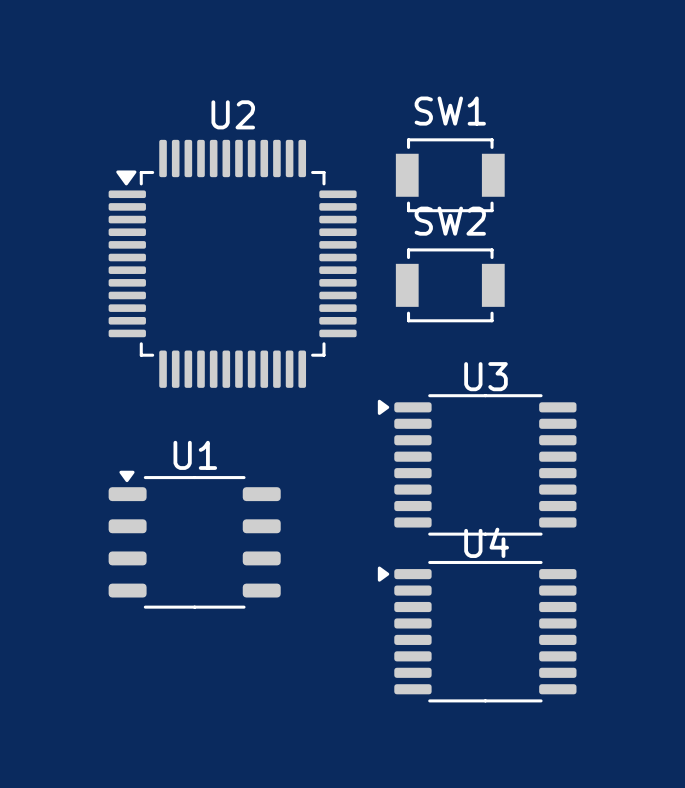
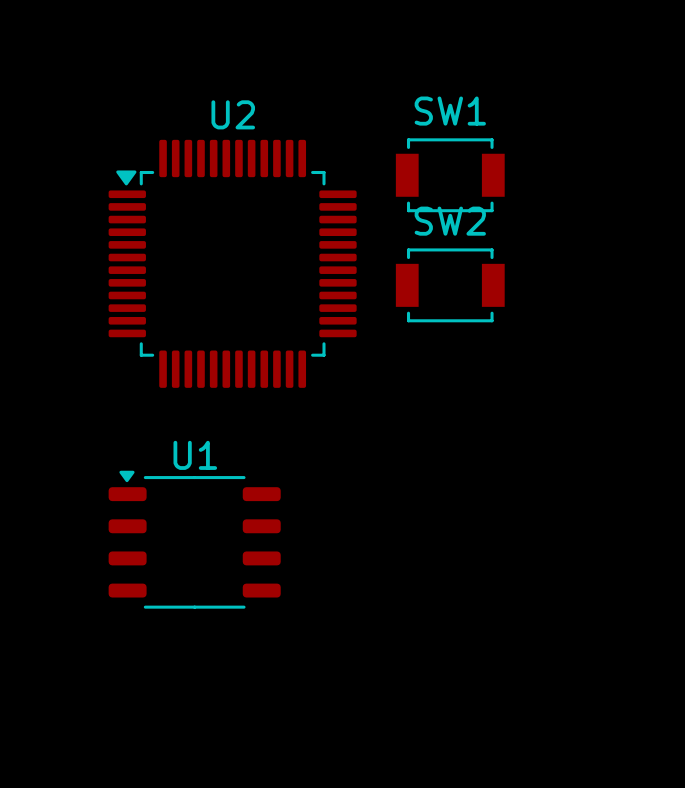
U3: (477, 464) -> none
U4: (477, 631) -> none

